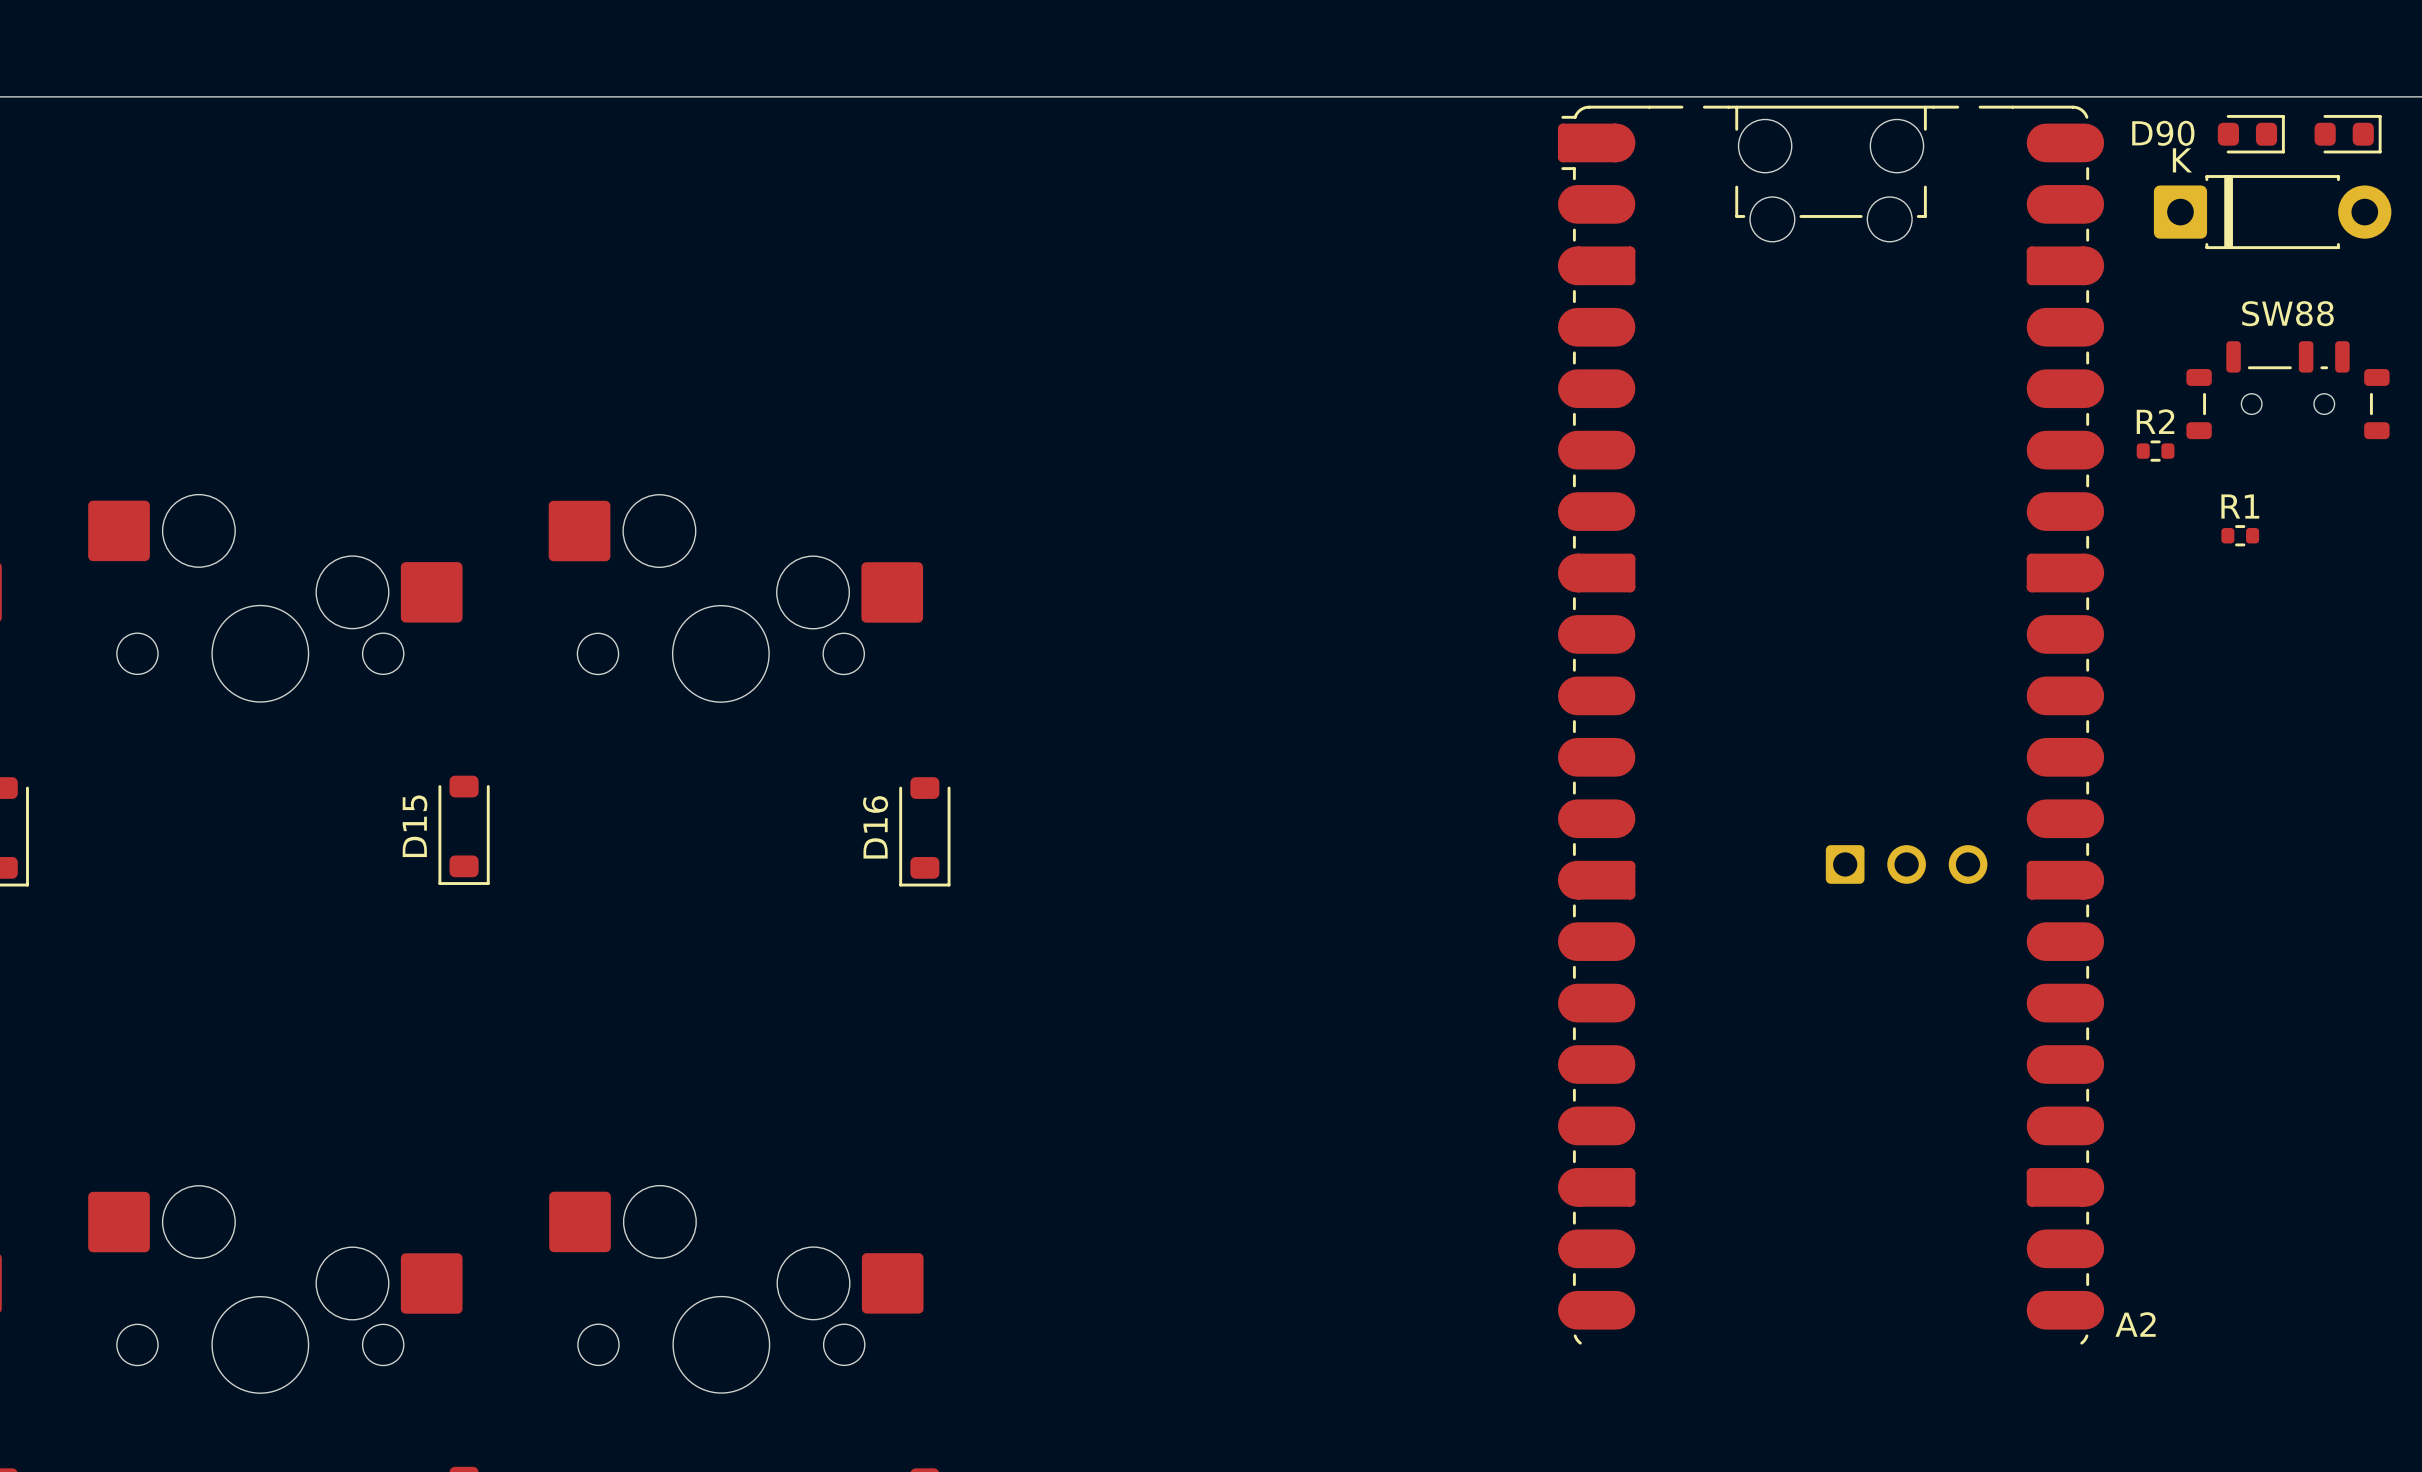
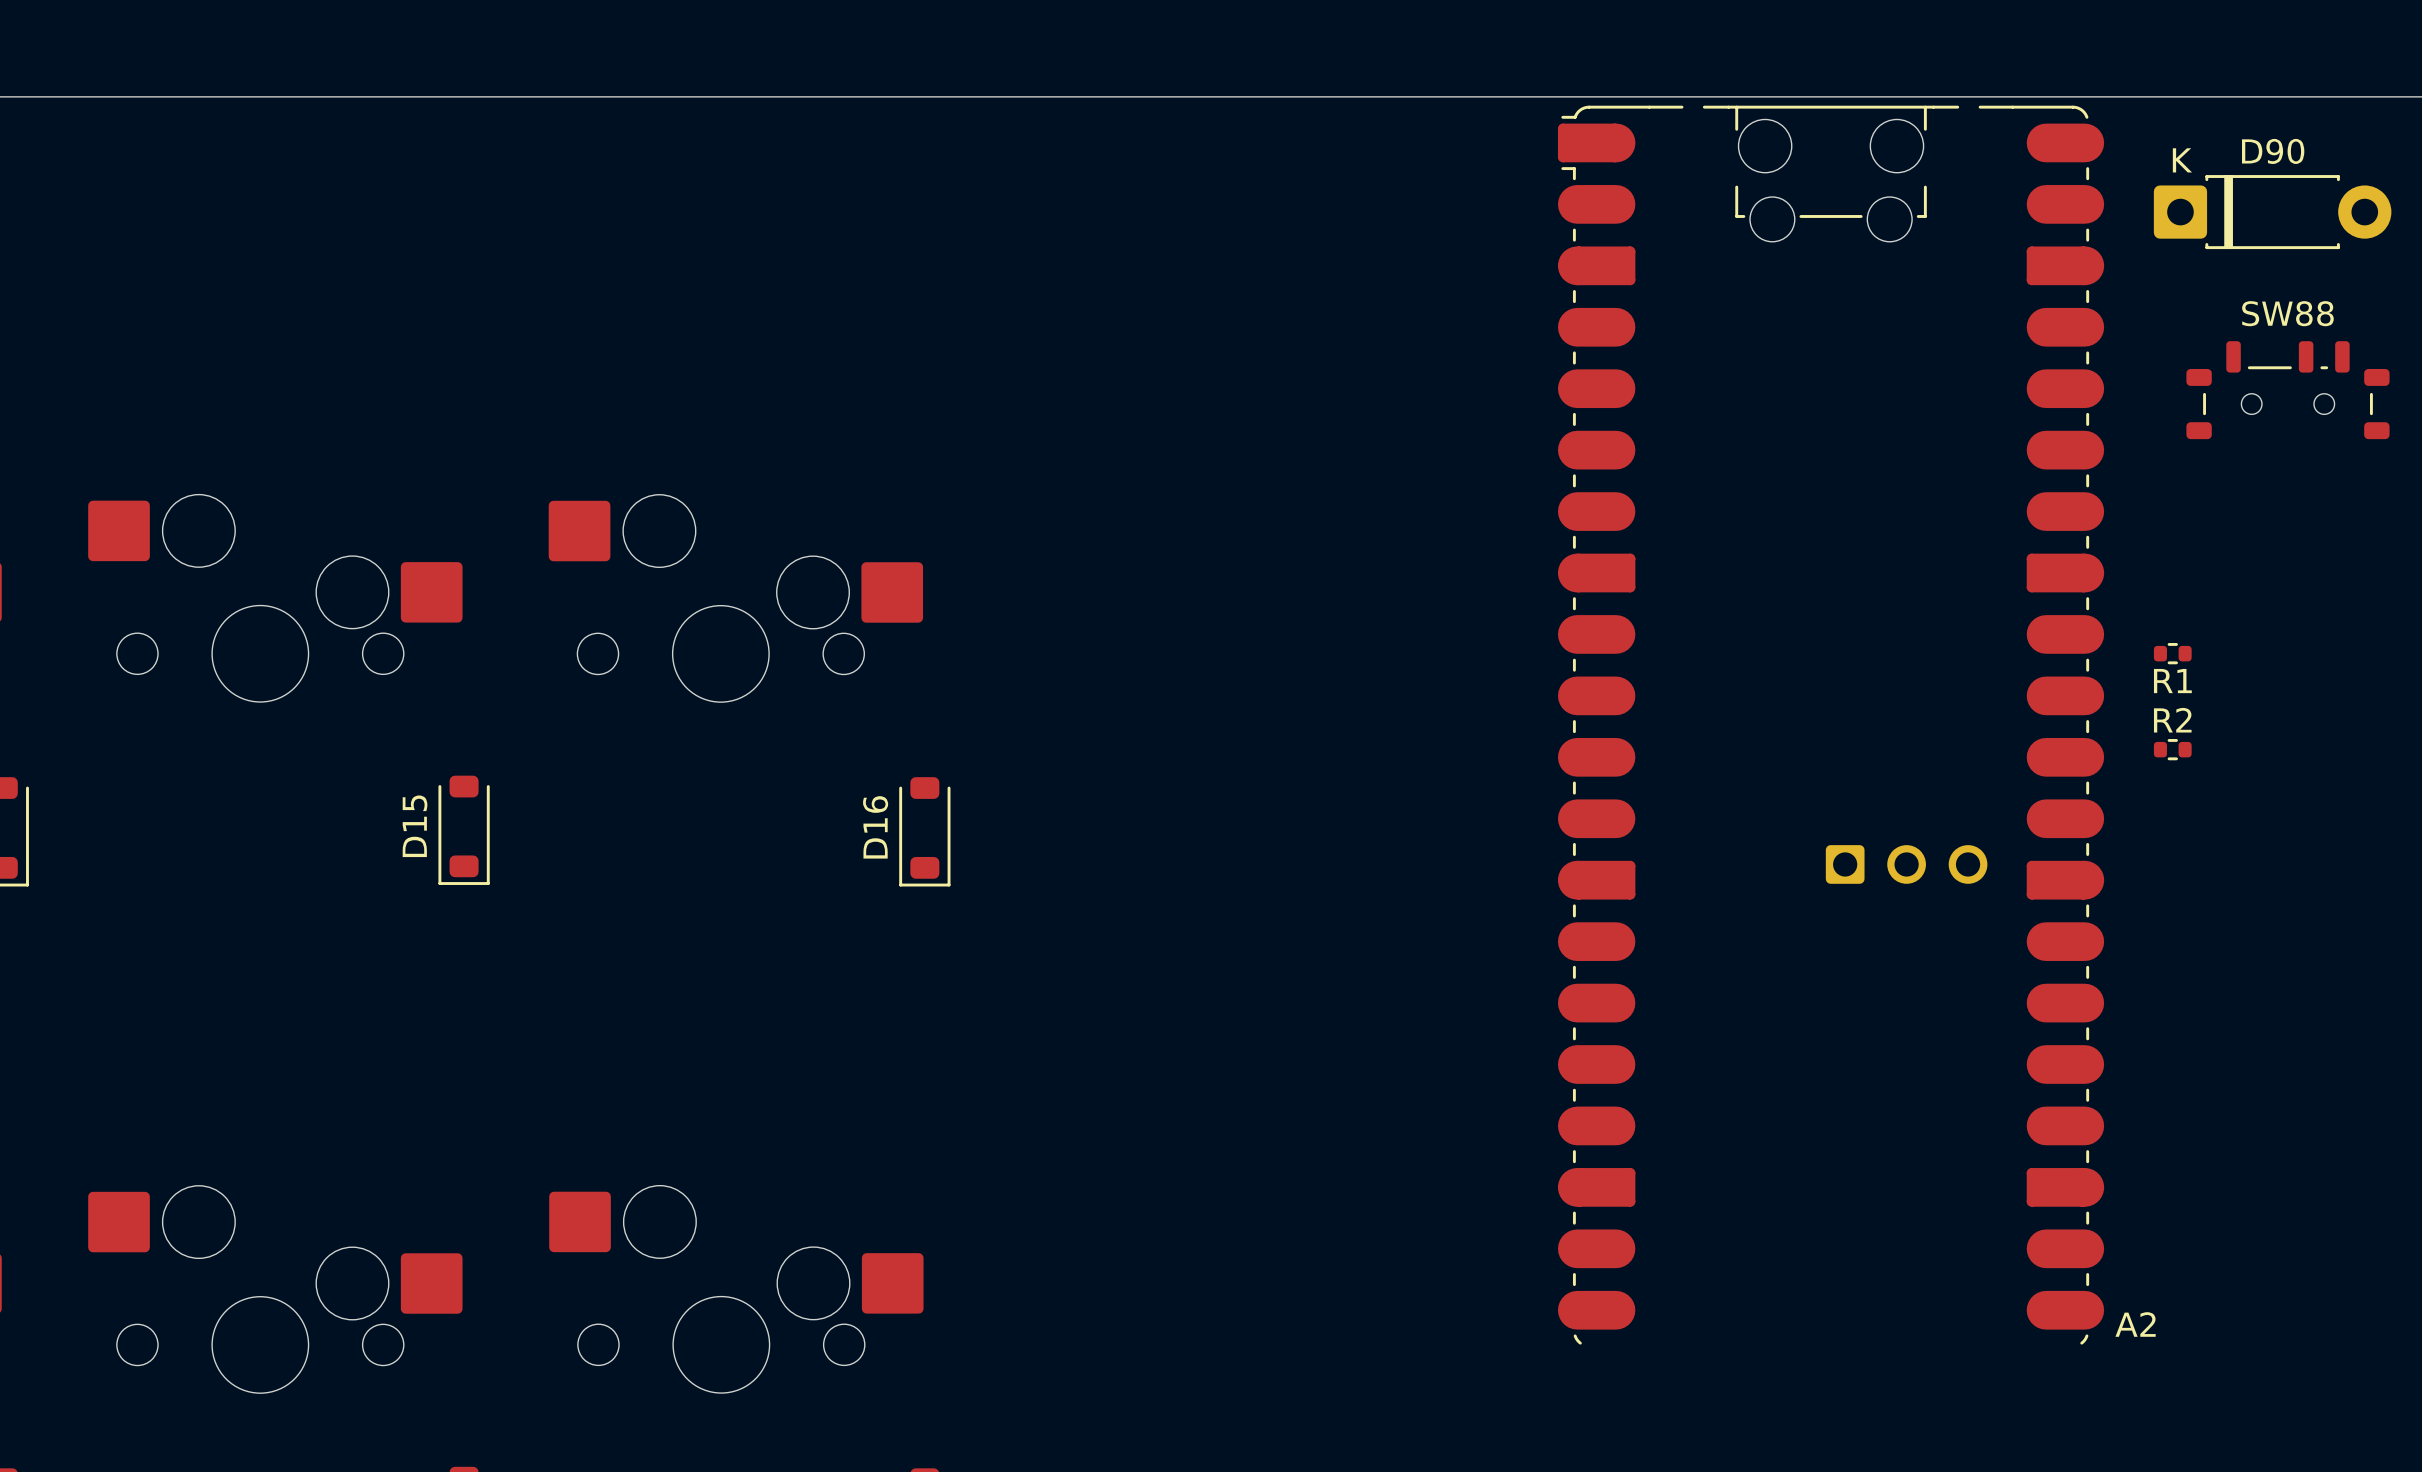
D90 name position: D90 (2163, 133) -> D90 (2273, 151)
part: (2251, 134) -> none
part: (2348, 134) -> none
R2 position: (2155, 451) -> (2172, 749)
R1 name position: R1 (2240, 506) -> R1 (2172, 681)
R1 position: (2240, 535) -> (2172, 653)

